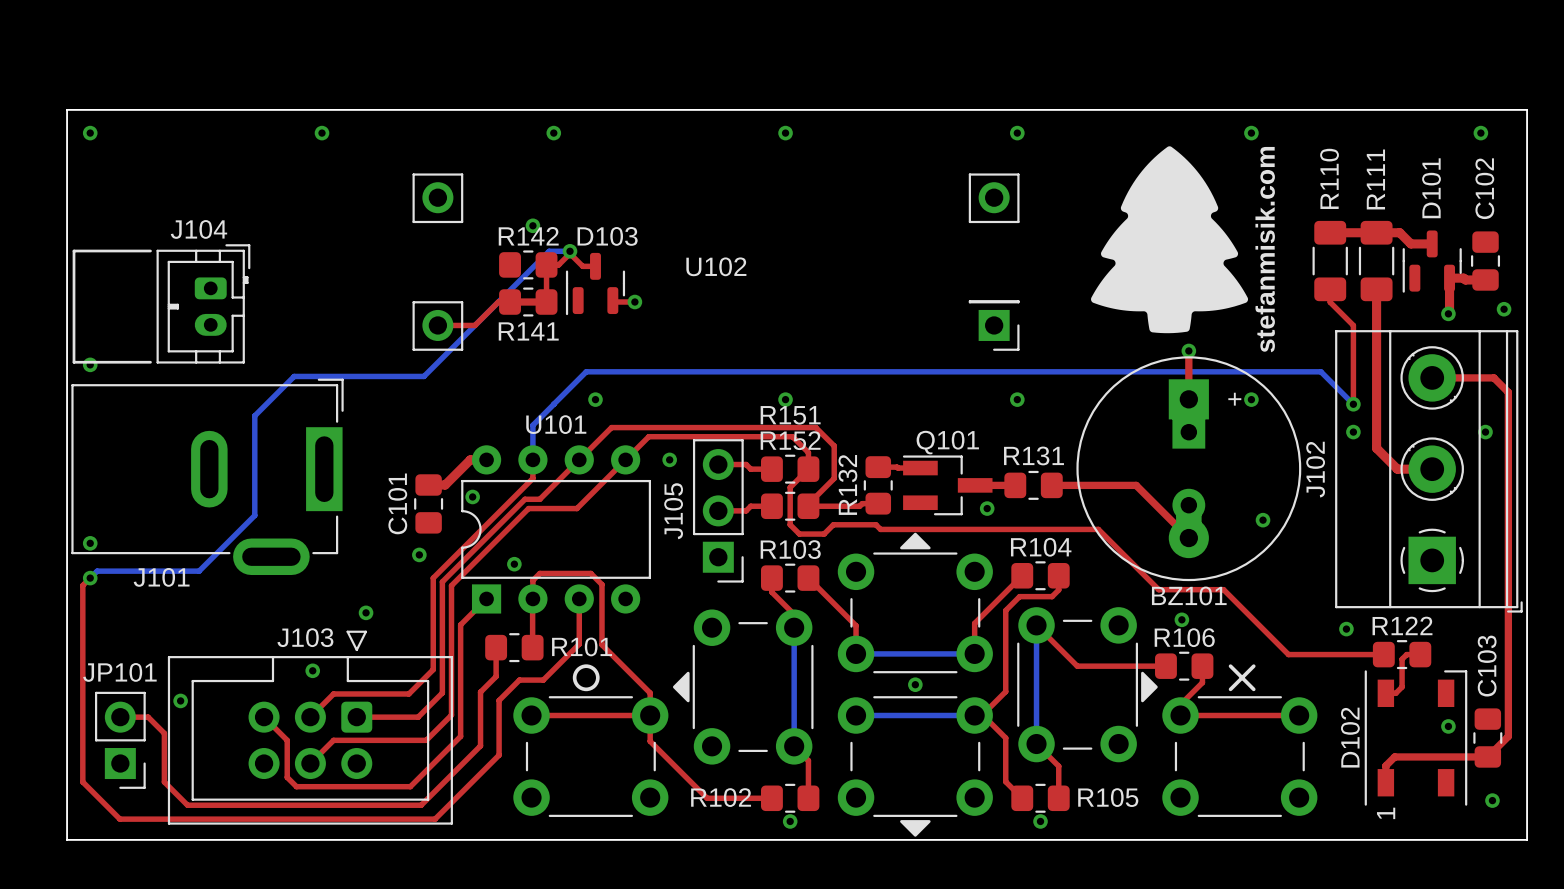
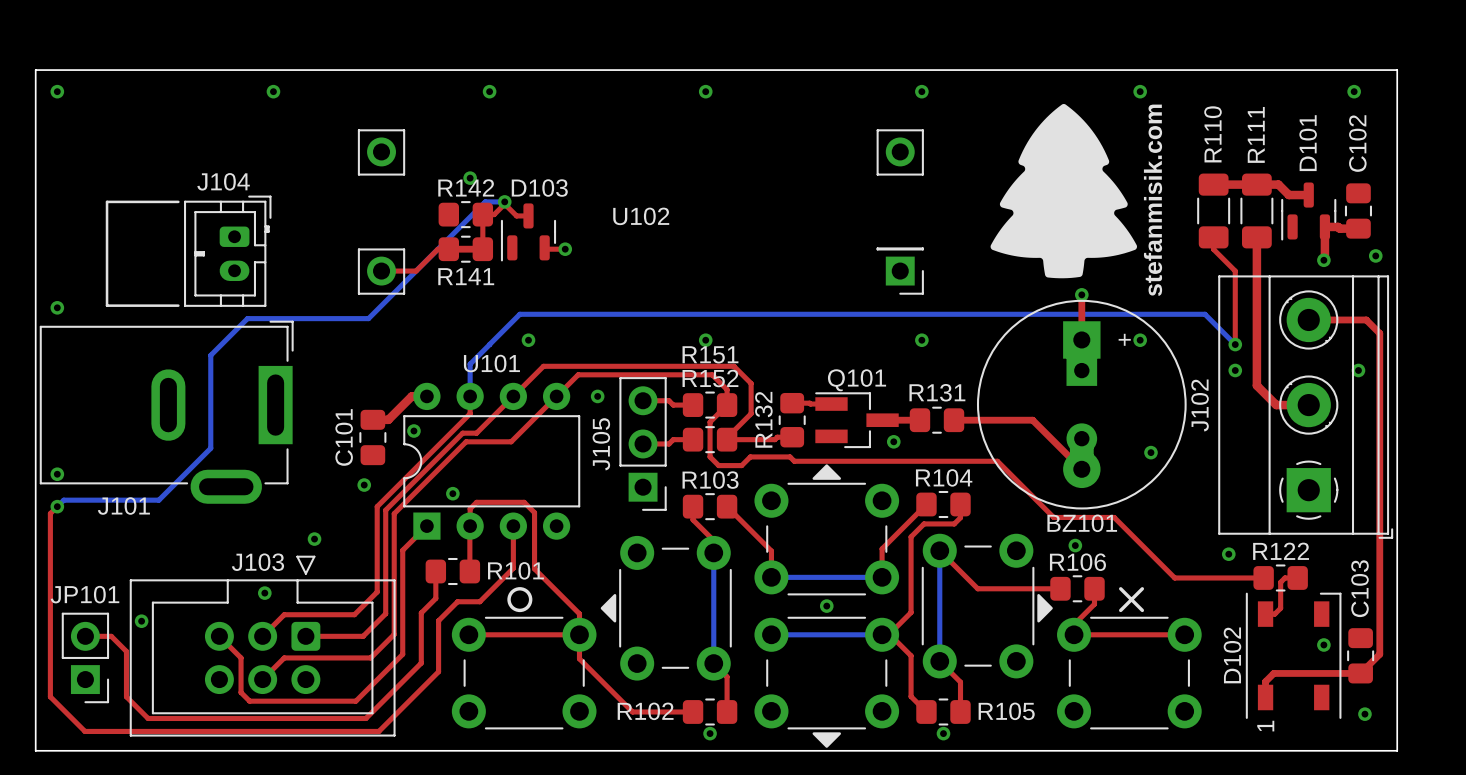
line: (150, 251) (74, 251) (74, 362) (150, 362) -> (178, 201) (107, 201) (107, 305) (178, 305)
J104 position: (203, 303) -> (227, 251)

